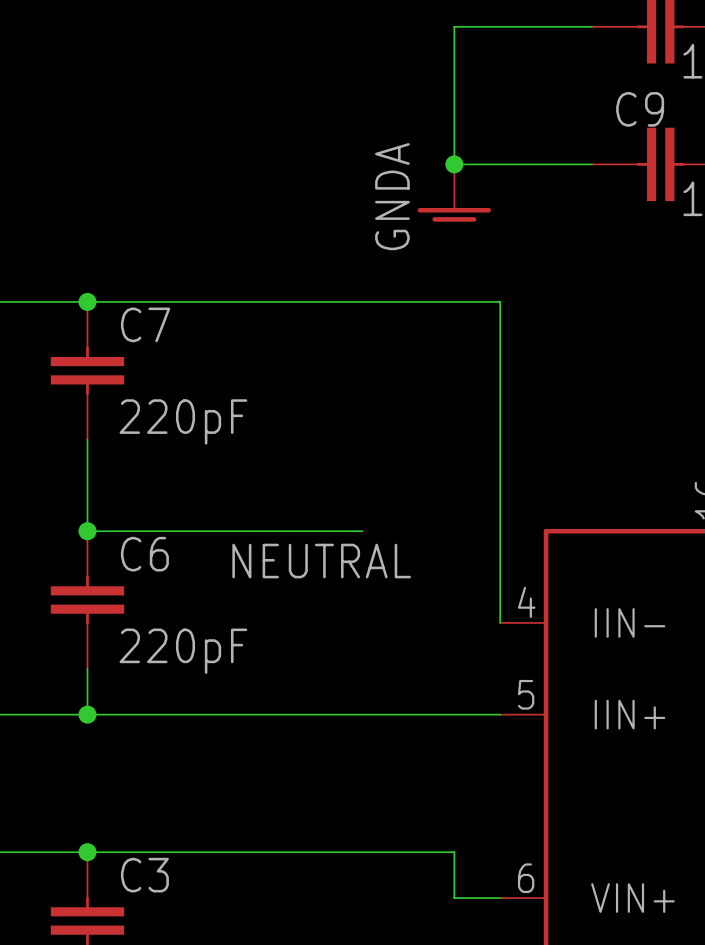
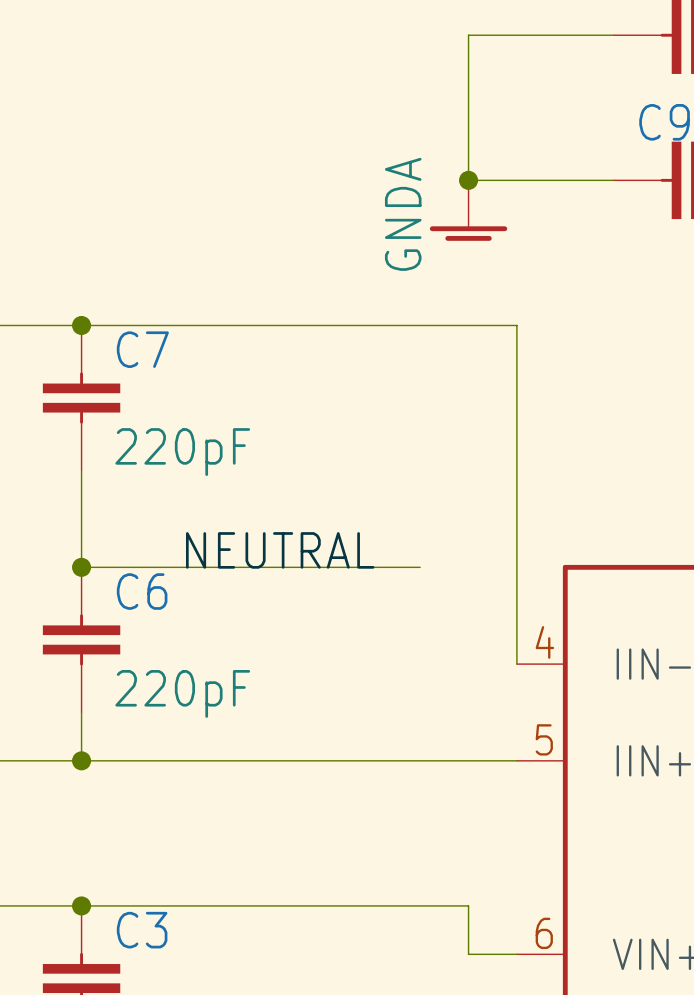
wire: none -> (371, 567) (420, 567)
label position: NEUTRAL (321, 561) -> NEUTRAL (280, 550)

